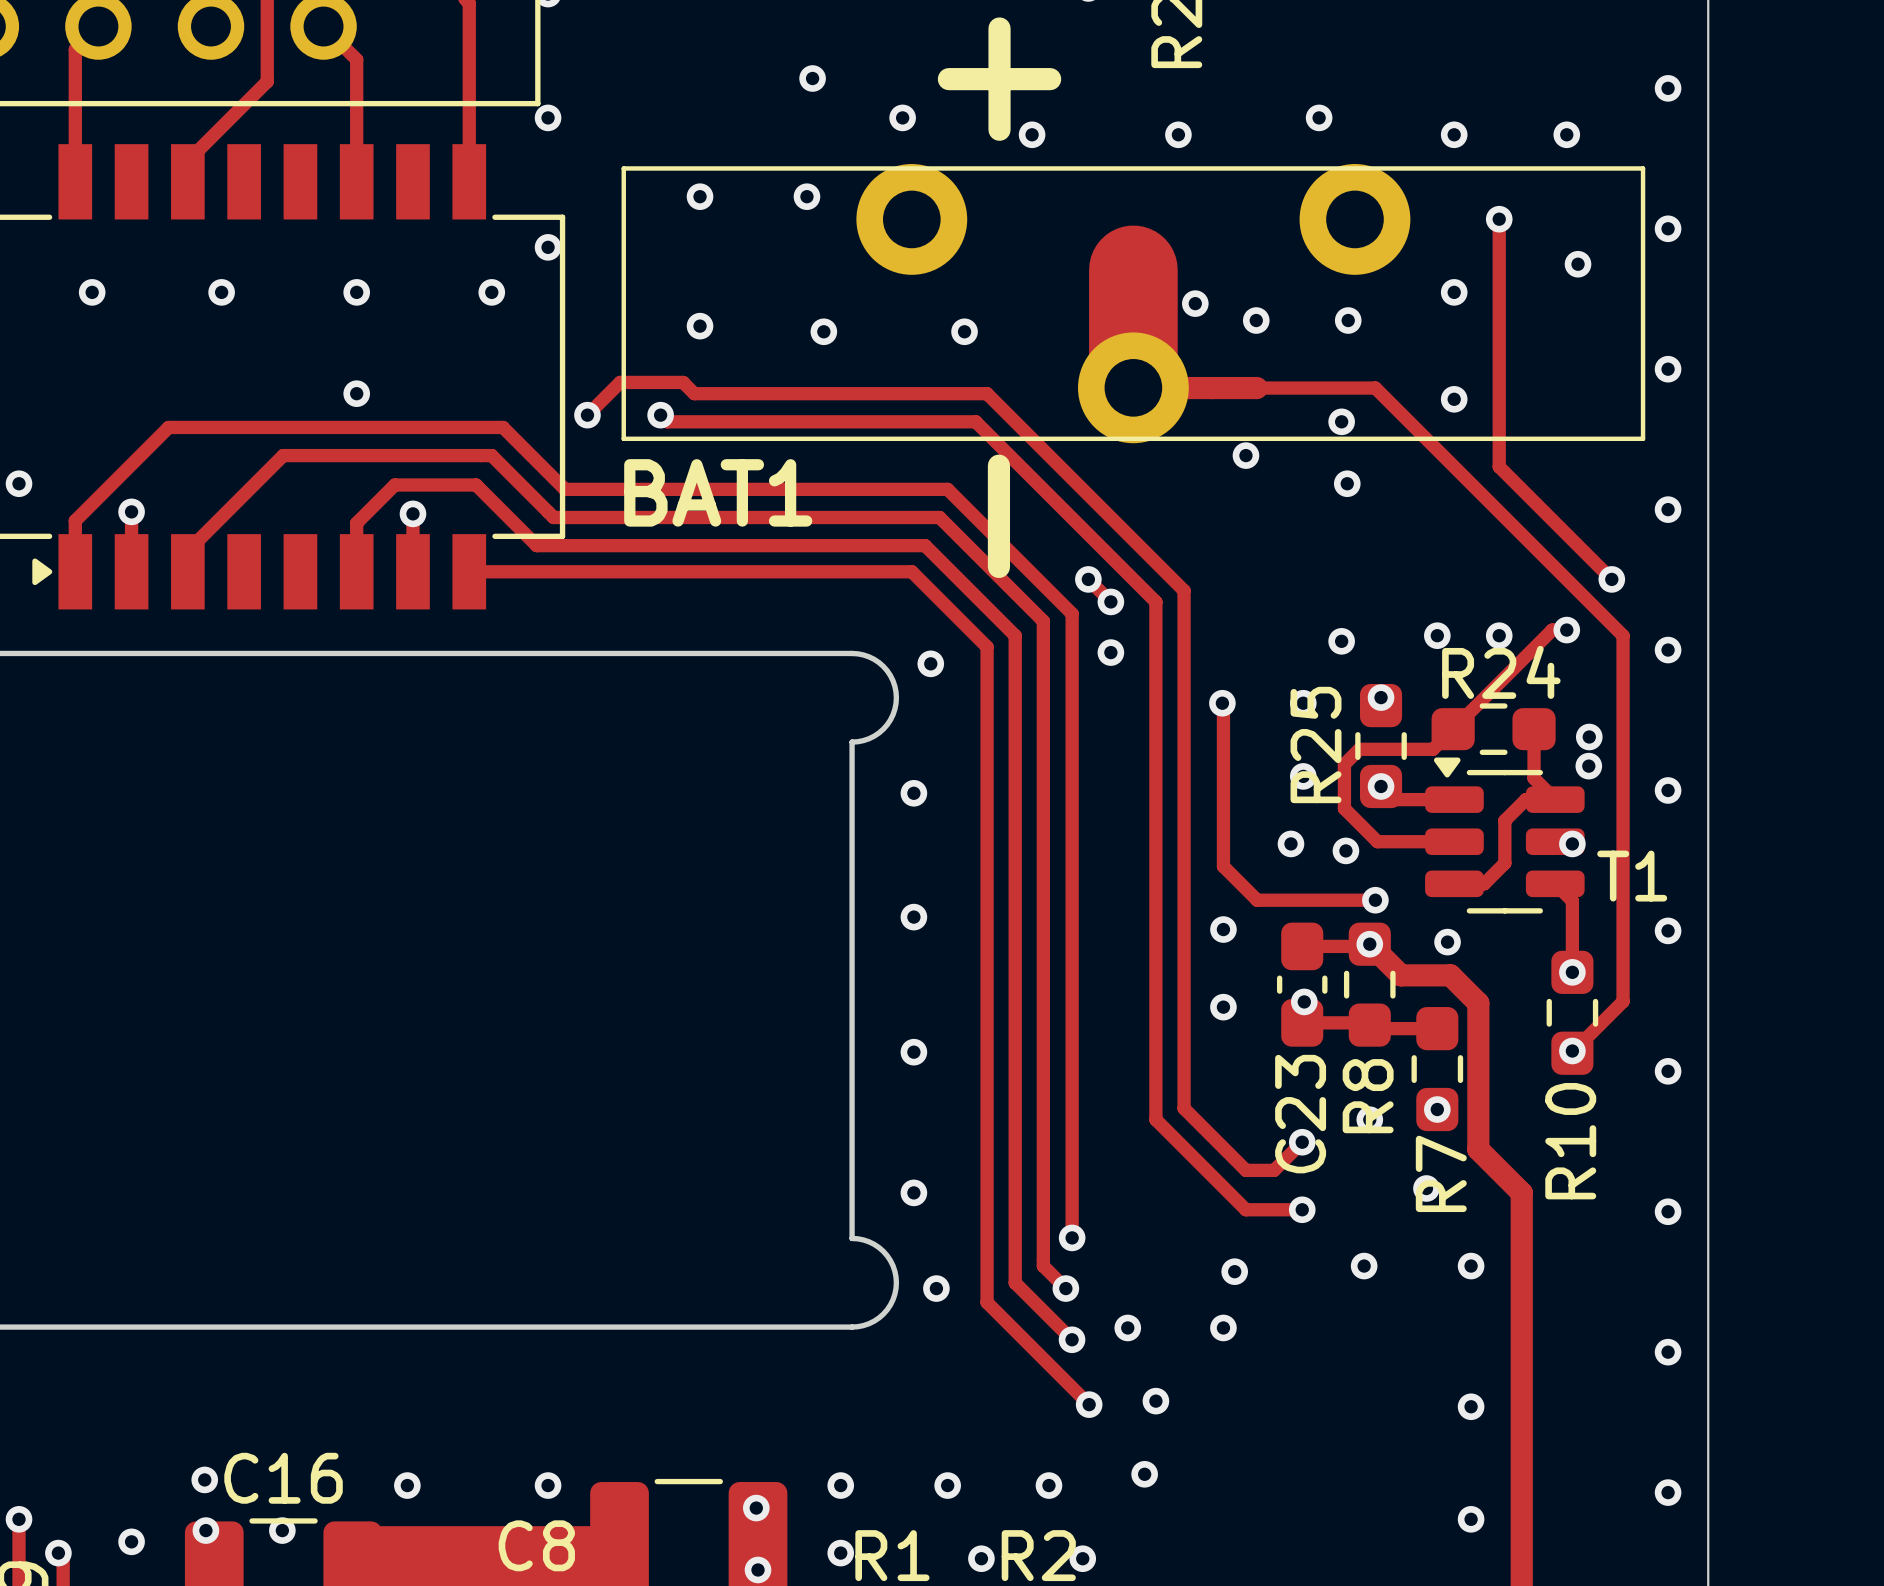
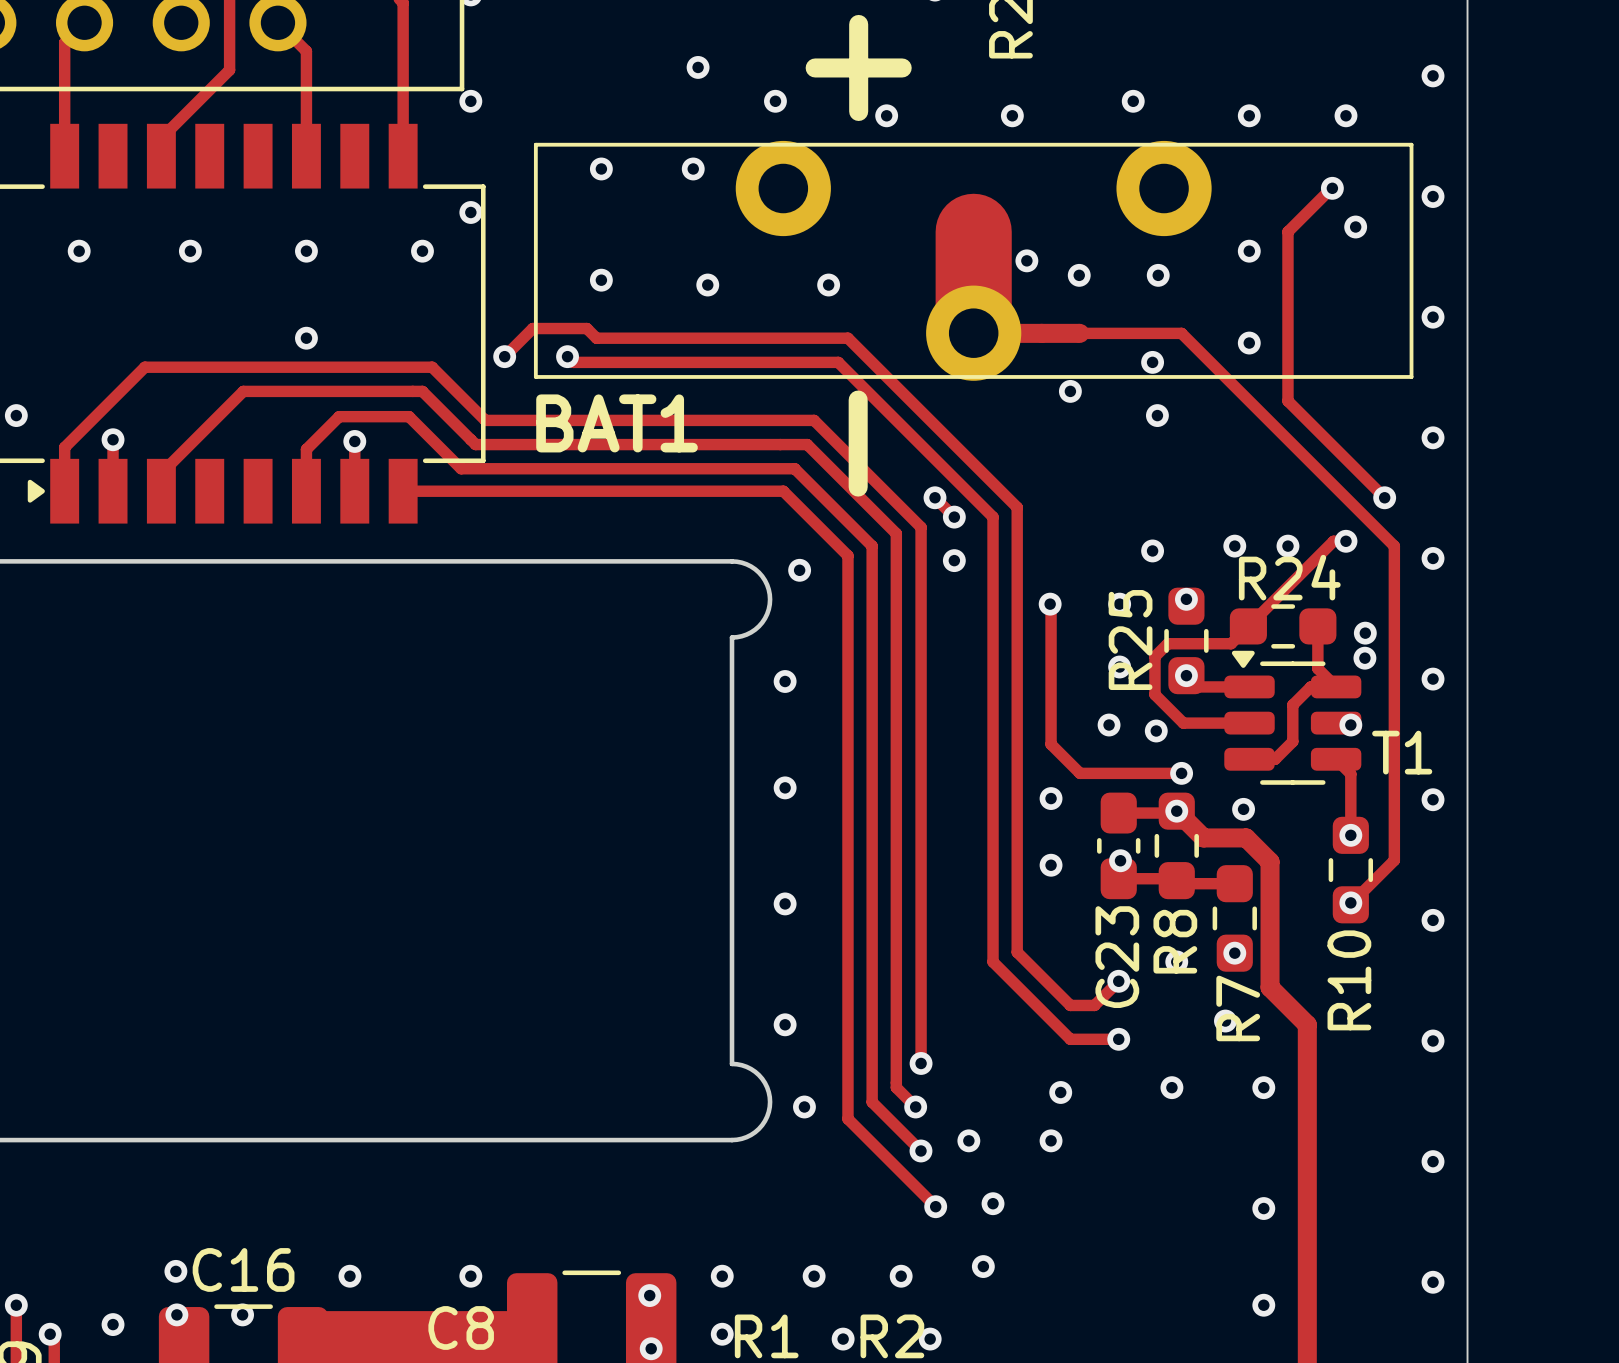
track: (1499, 219) (1499, 269) -> (1332, 188) (1287, 231)
via position: (1499, 219) -> (1332, 188)

